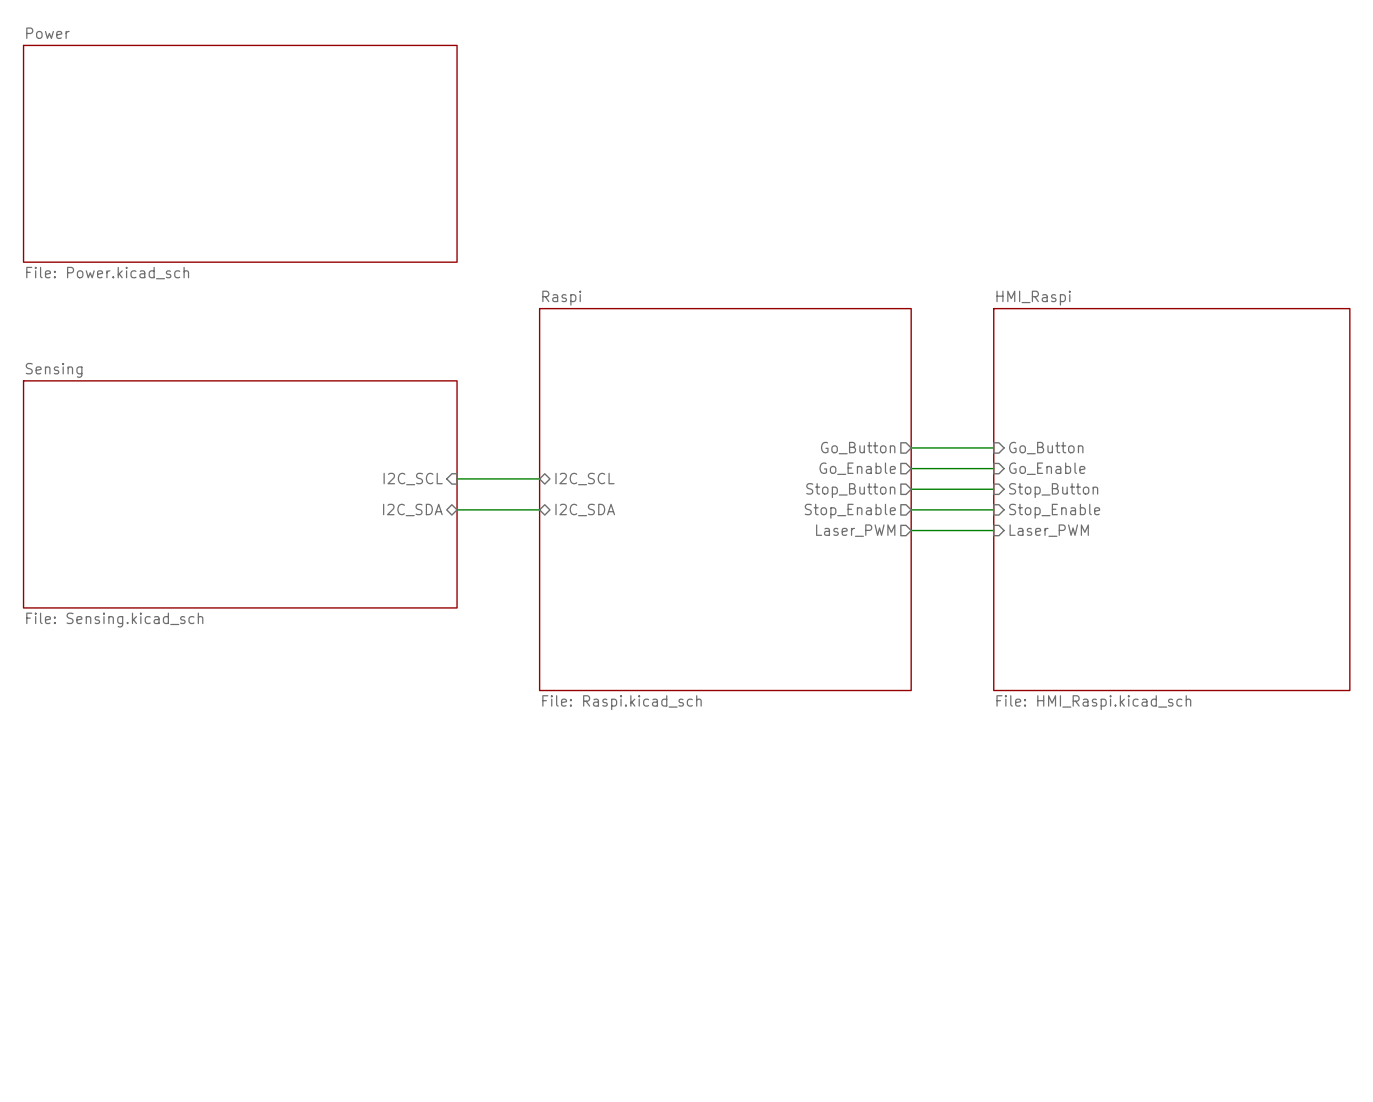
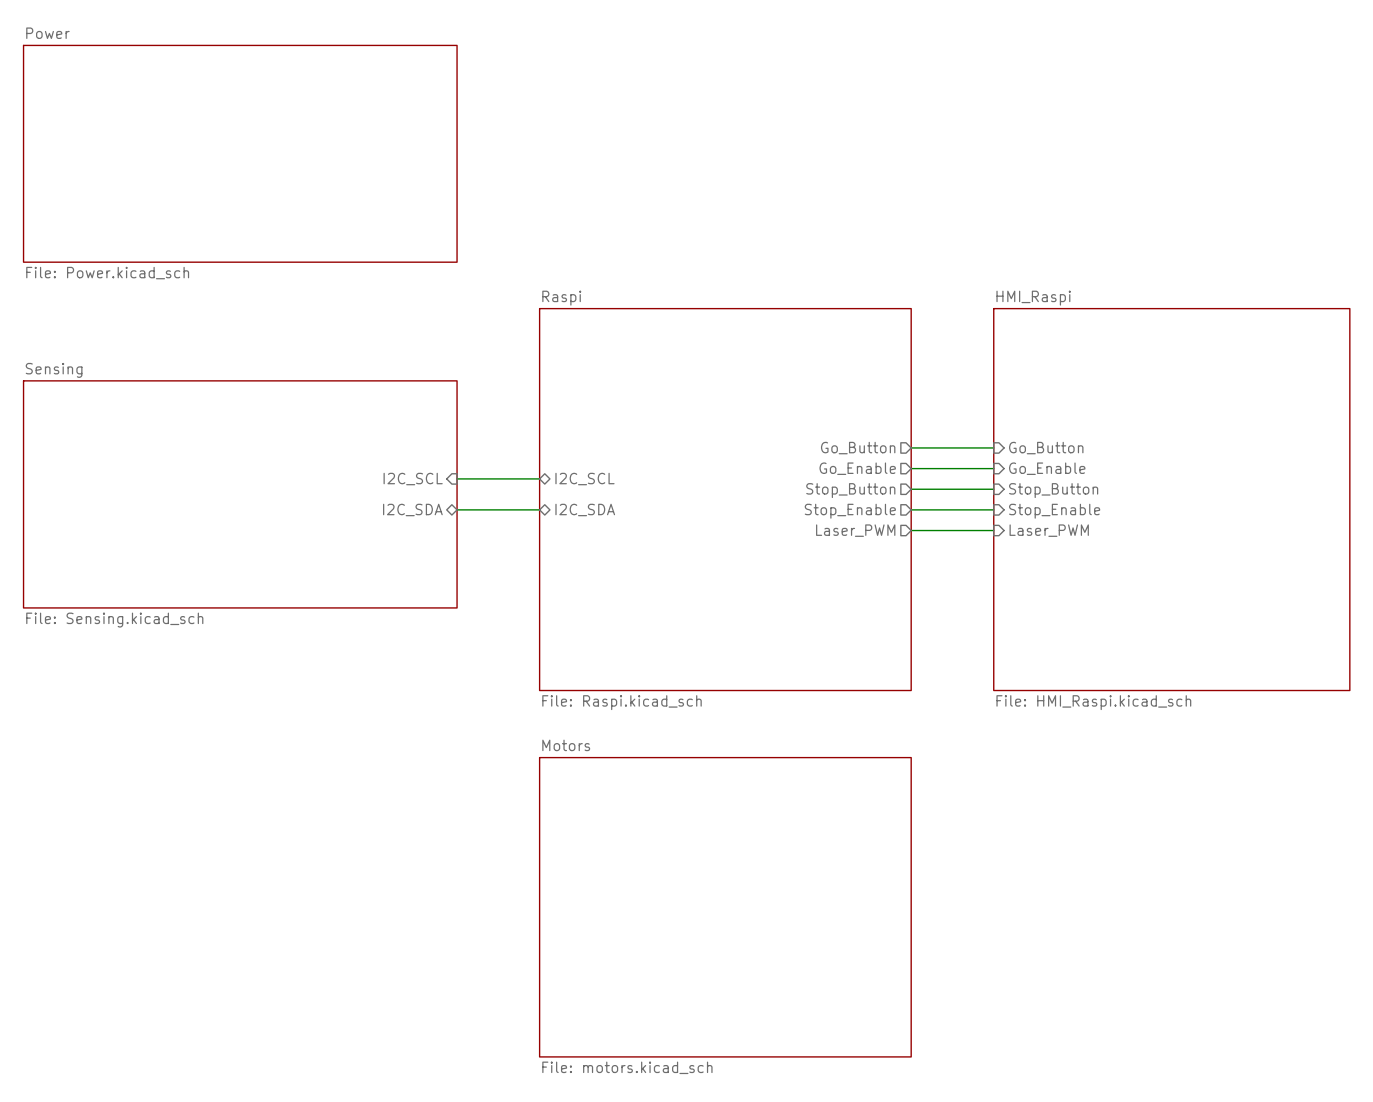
sheet Motors: none -> File: motors.kicad_sch (725, 907)

